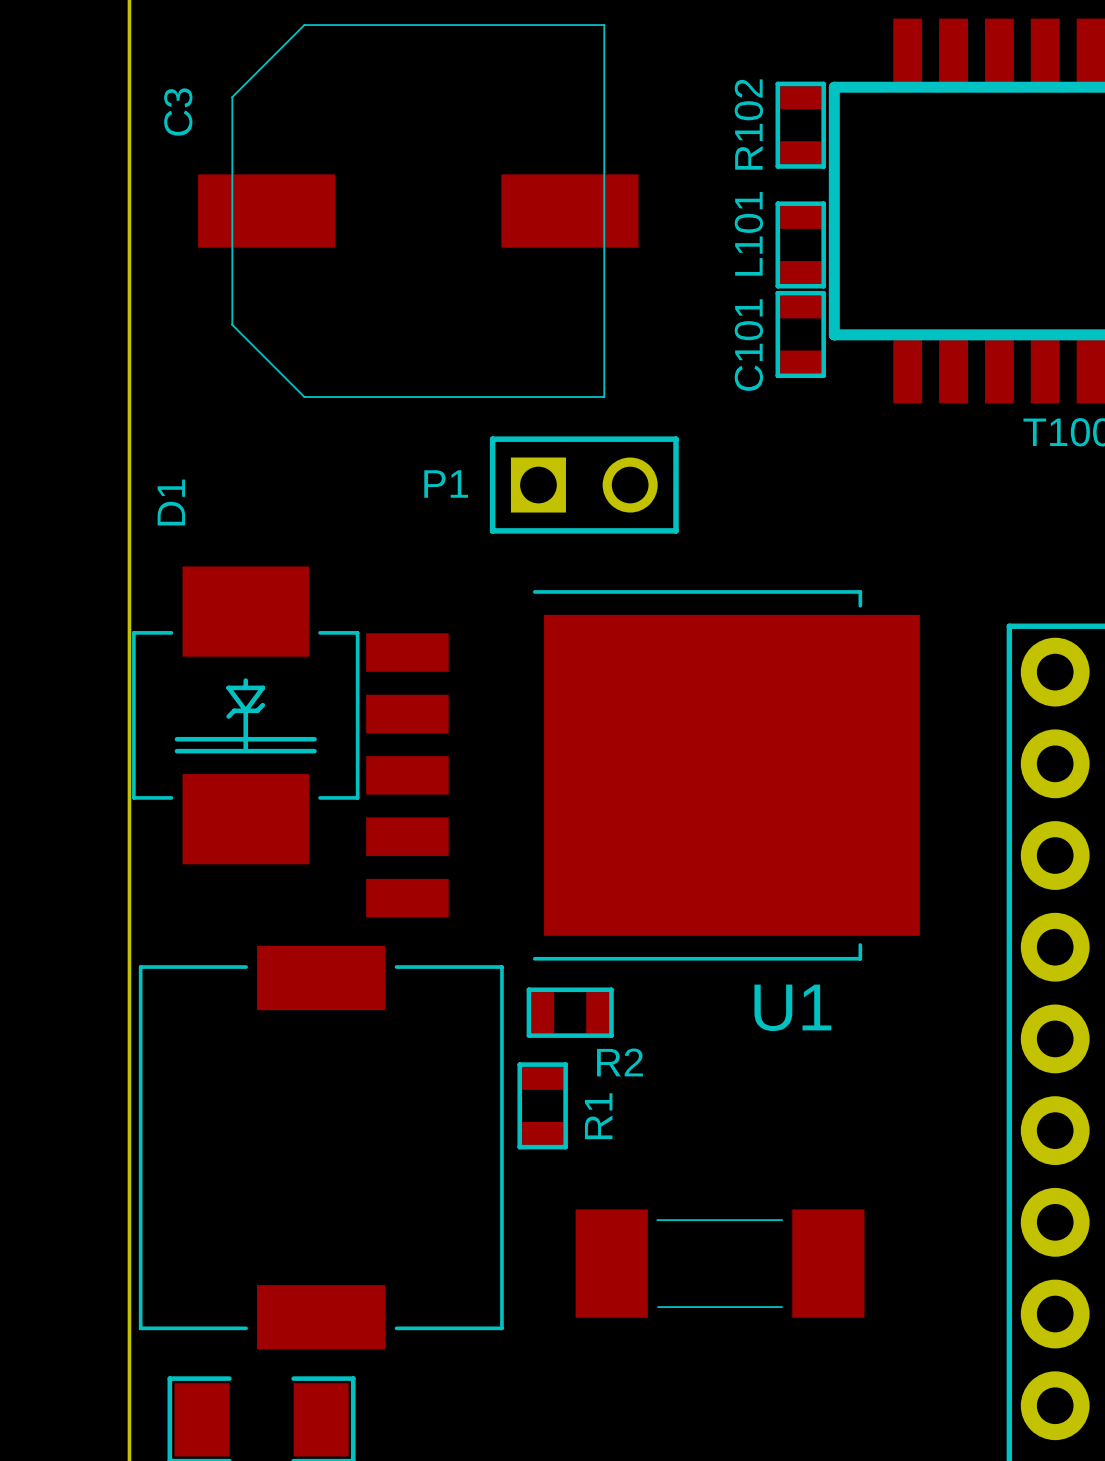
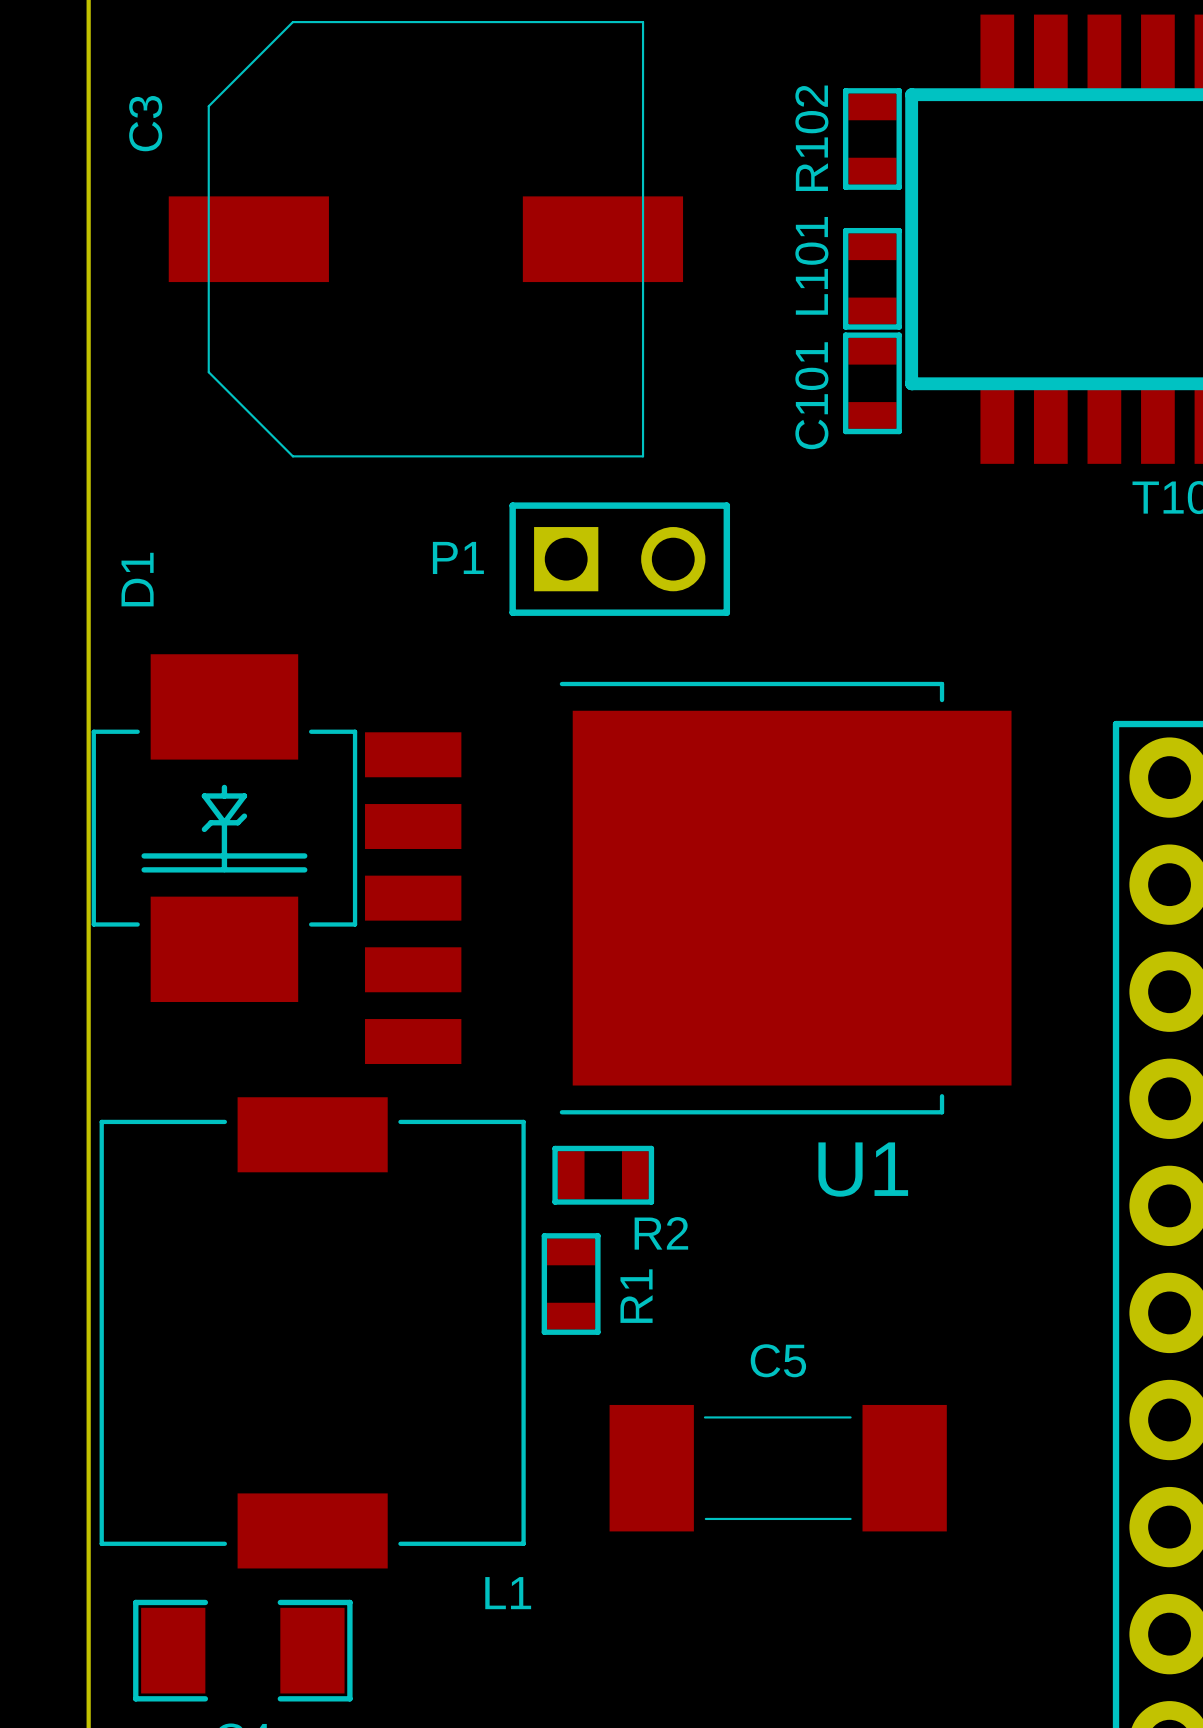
C5 name: none -> C5 (778, 1360)
L1 name: none -> L1 (508, 1593)

